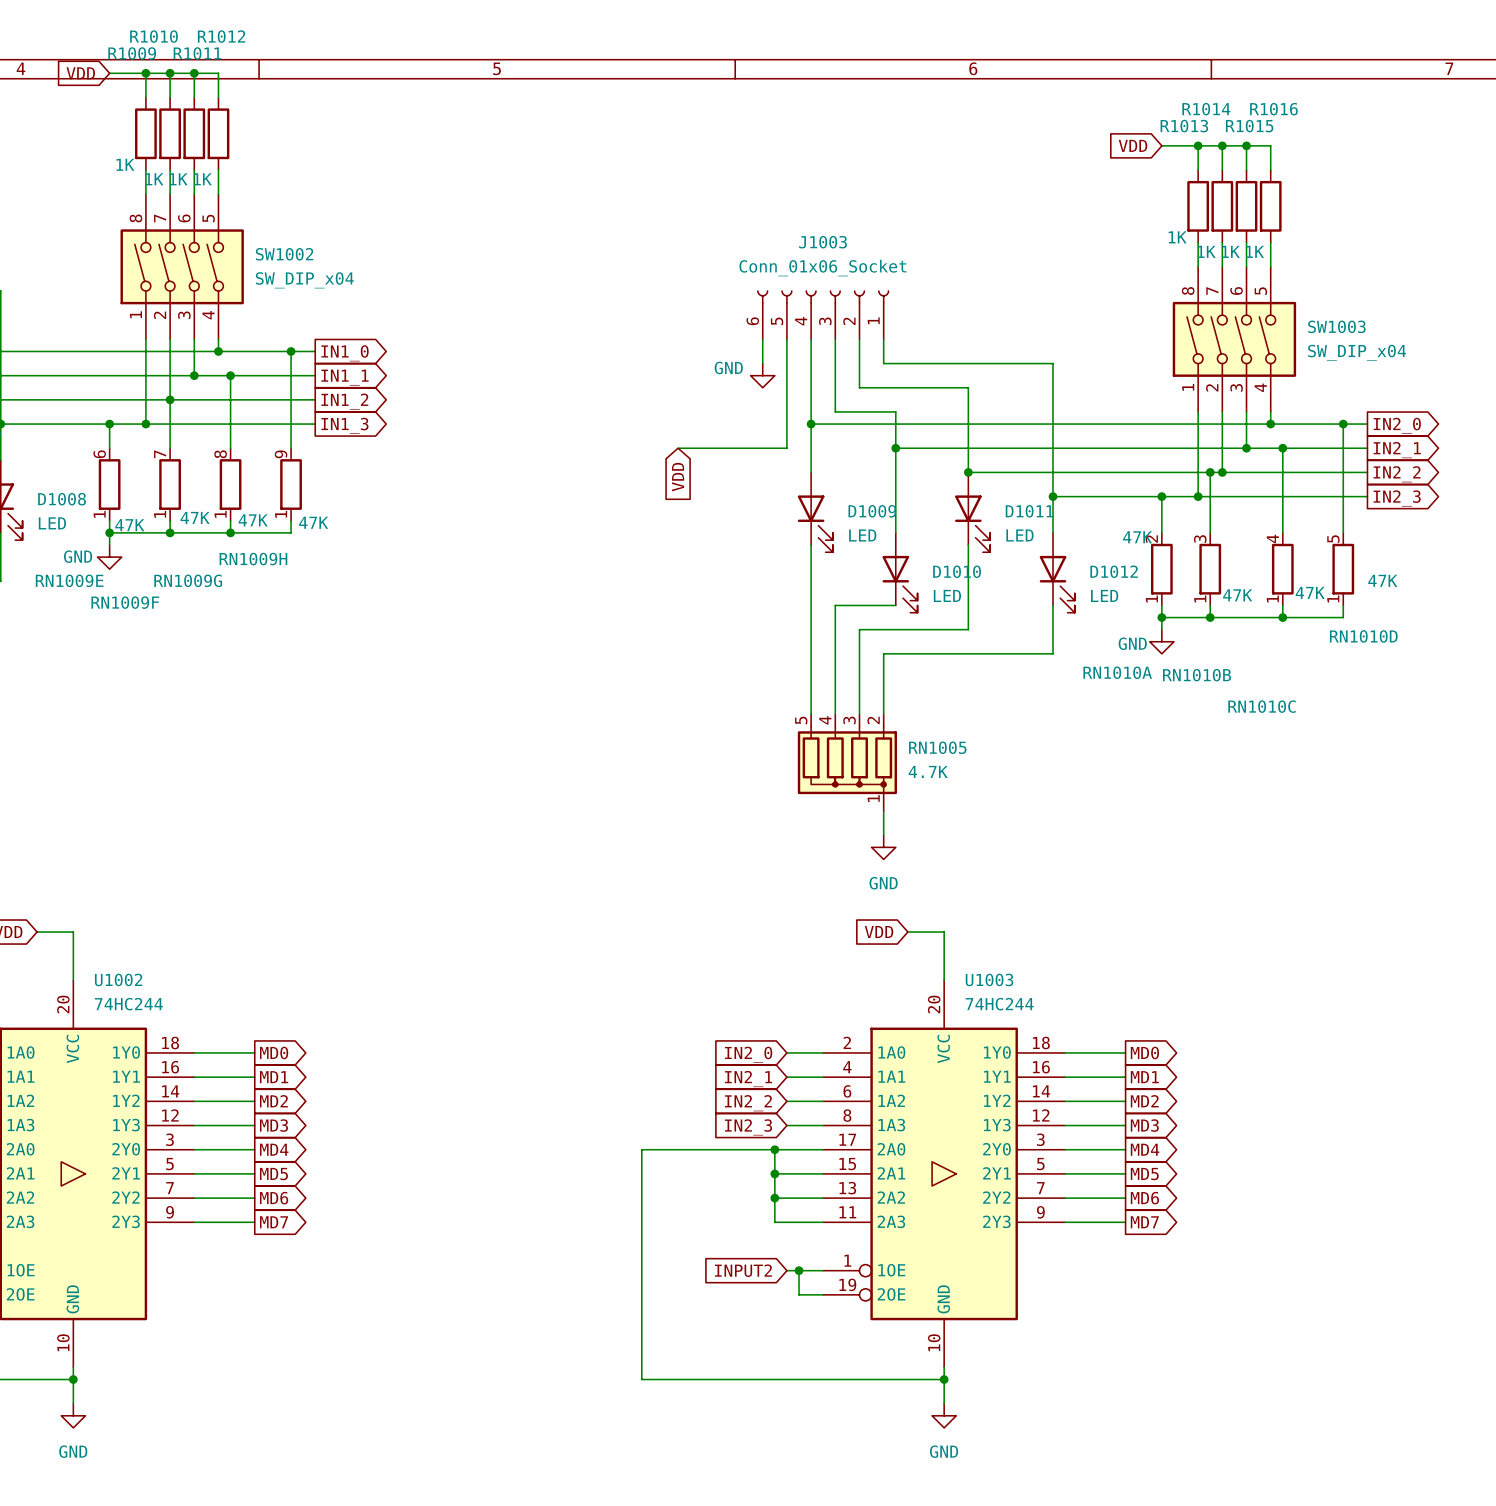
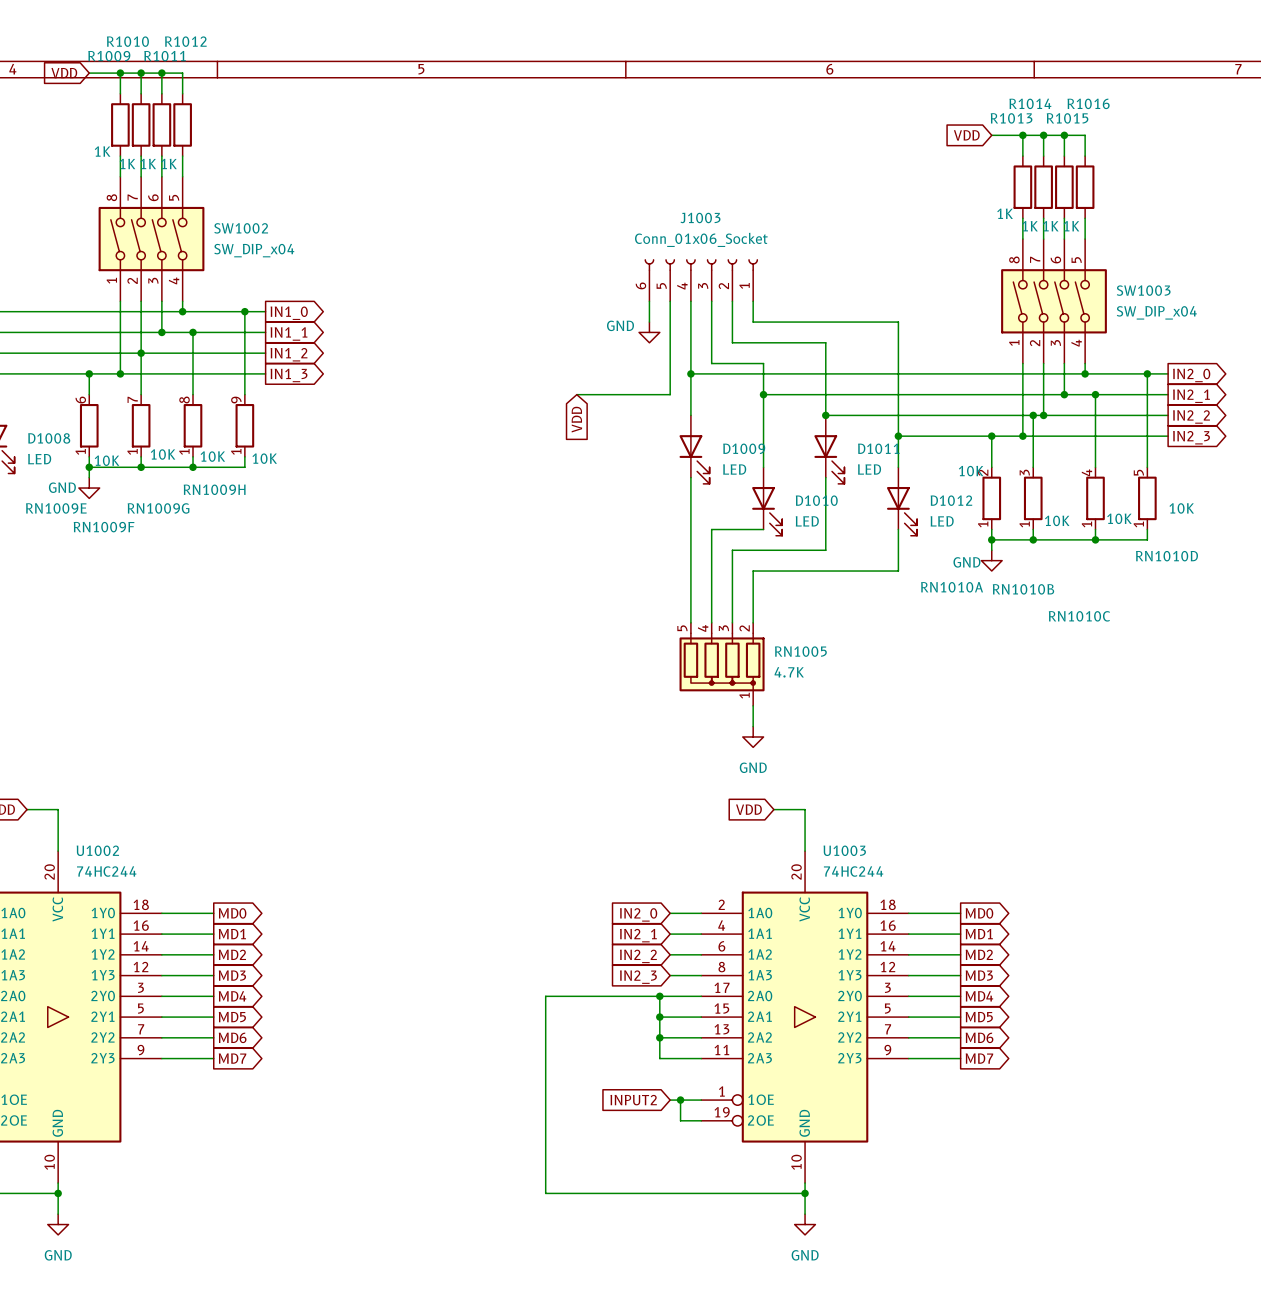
RN1009F value: 47K (195, 517) -> 10K (163, 454)
RN1009G value: 47K (253, 520) -> 10K (212, 456)
RN1009H value: 47K (313, 522) -> 10K (264, 458)
RN1009E value: 47K (129, 525) -> 10K (107, 460)
RN1010A value: 47K (1137, 537) -> 10K (971, 471)
RN1010D value: 47K (1382, 580) -> 10K (1181, 508)
RN1010C value: 47K (1310, 592) -> 10K (1119, 518)
RN1010B value: 47K (1237, 595) -> 10K (1057, 520)

